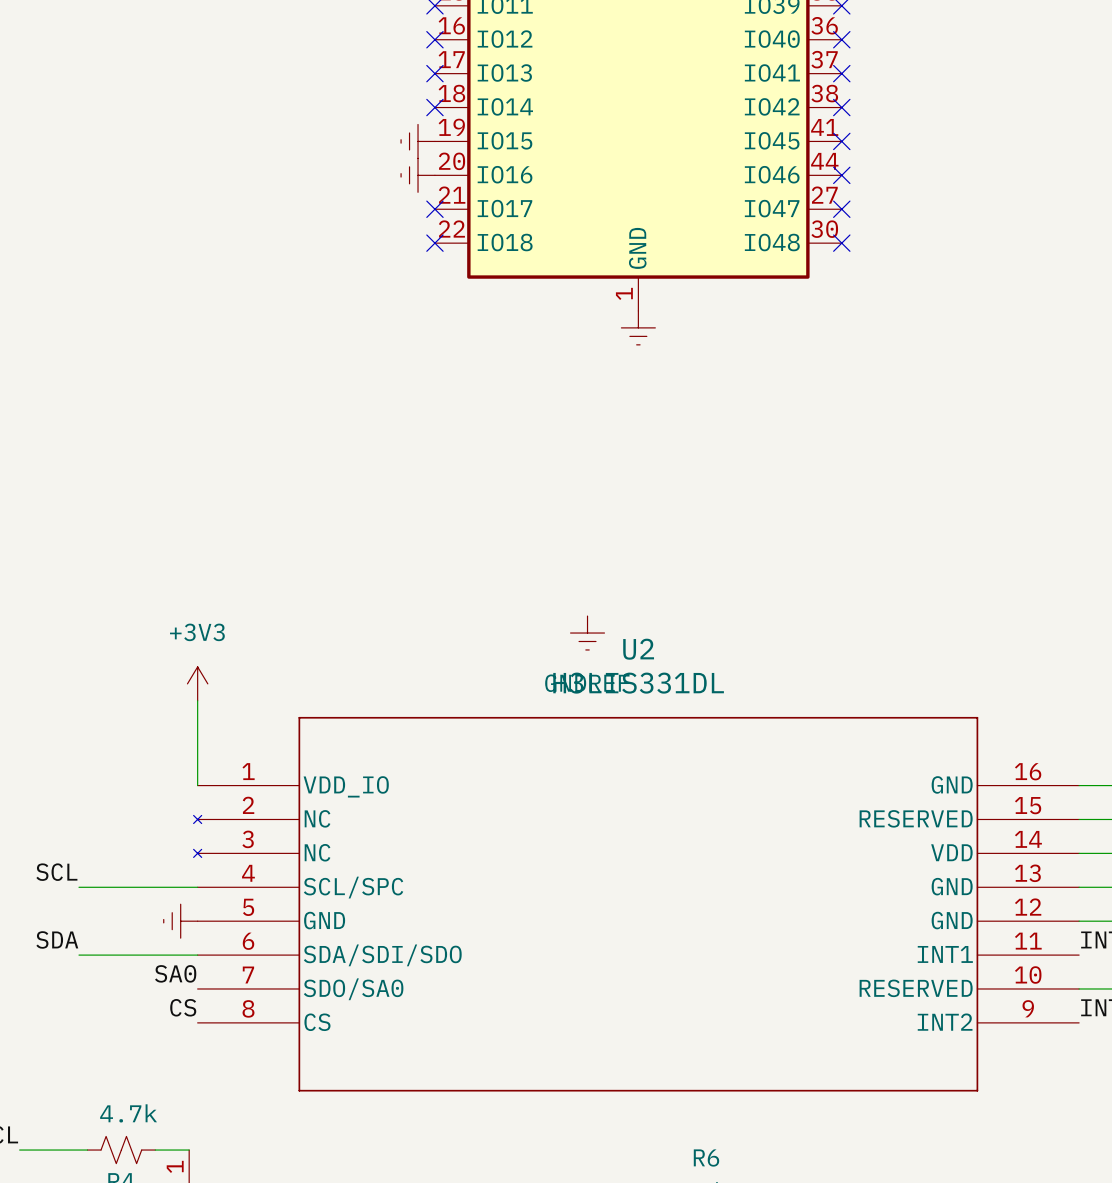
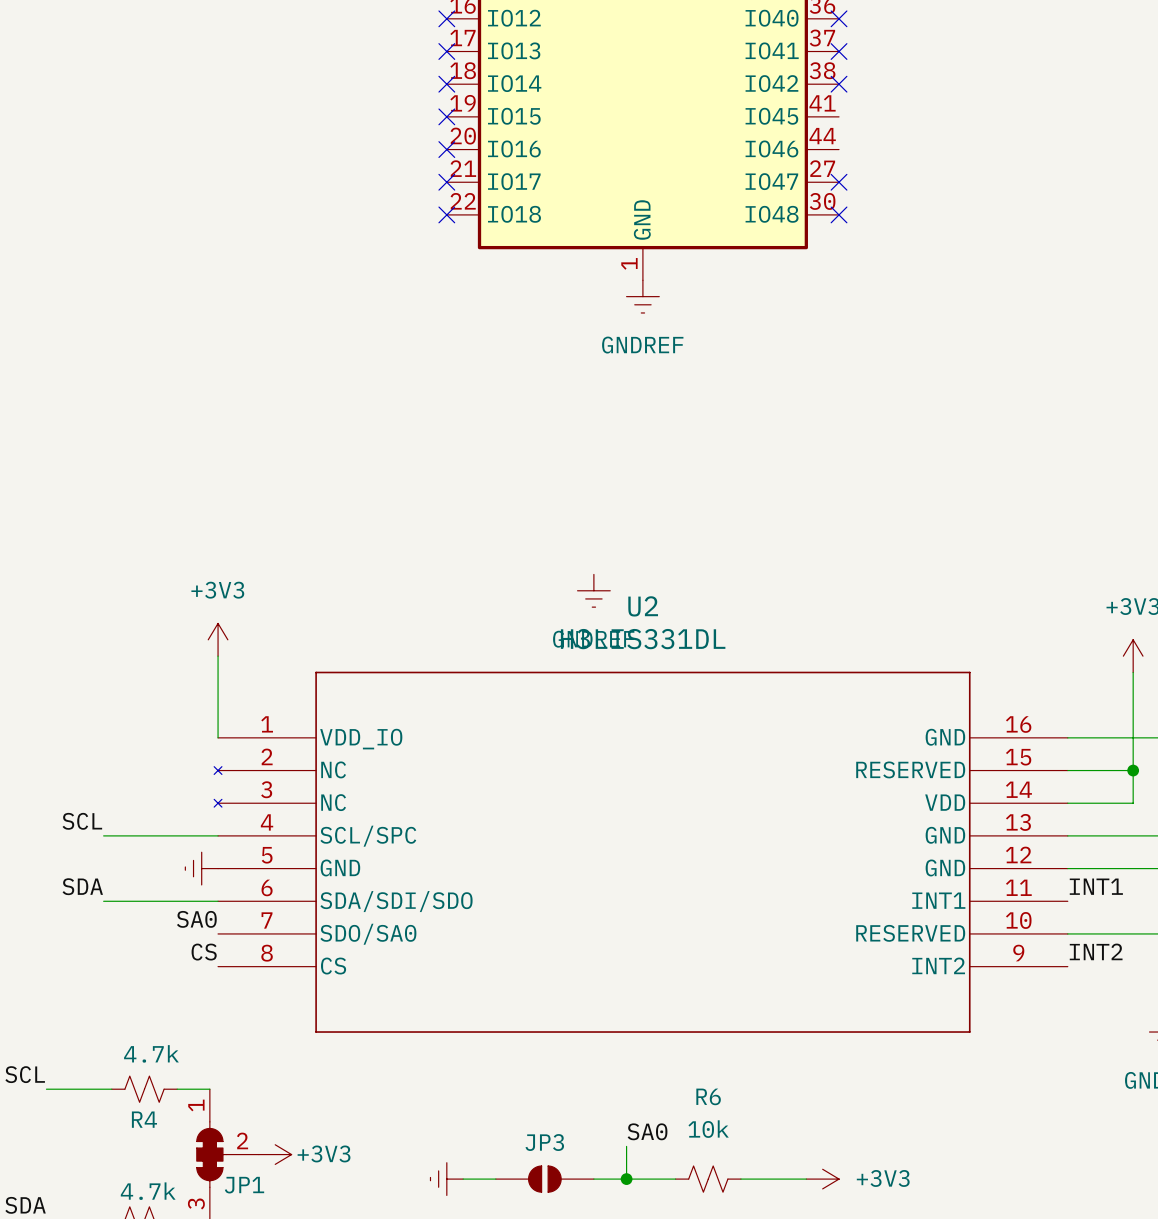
power symbol: (418, 141) -> none
no-connect mark: none -> (446, 116)
no-connect mark: (841, 141) -> none
power symbol: (418, 175) -> none
no-connect mark: none -> (446, 149)
no-connect mark: (841, 175) -> none
power symbol text: none -> GNDREF (642, 345)

